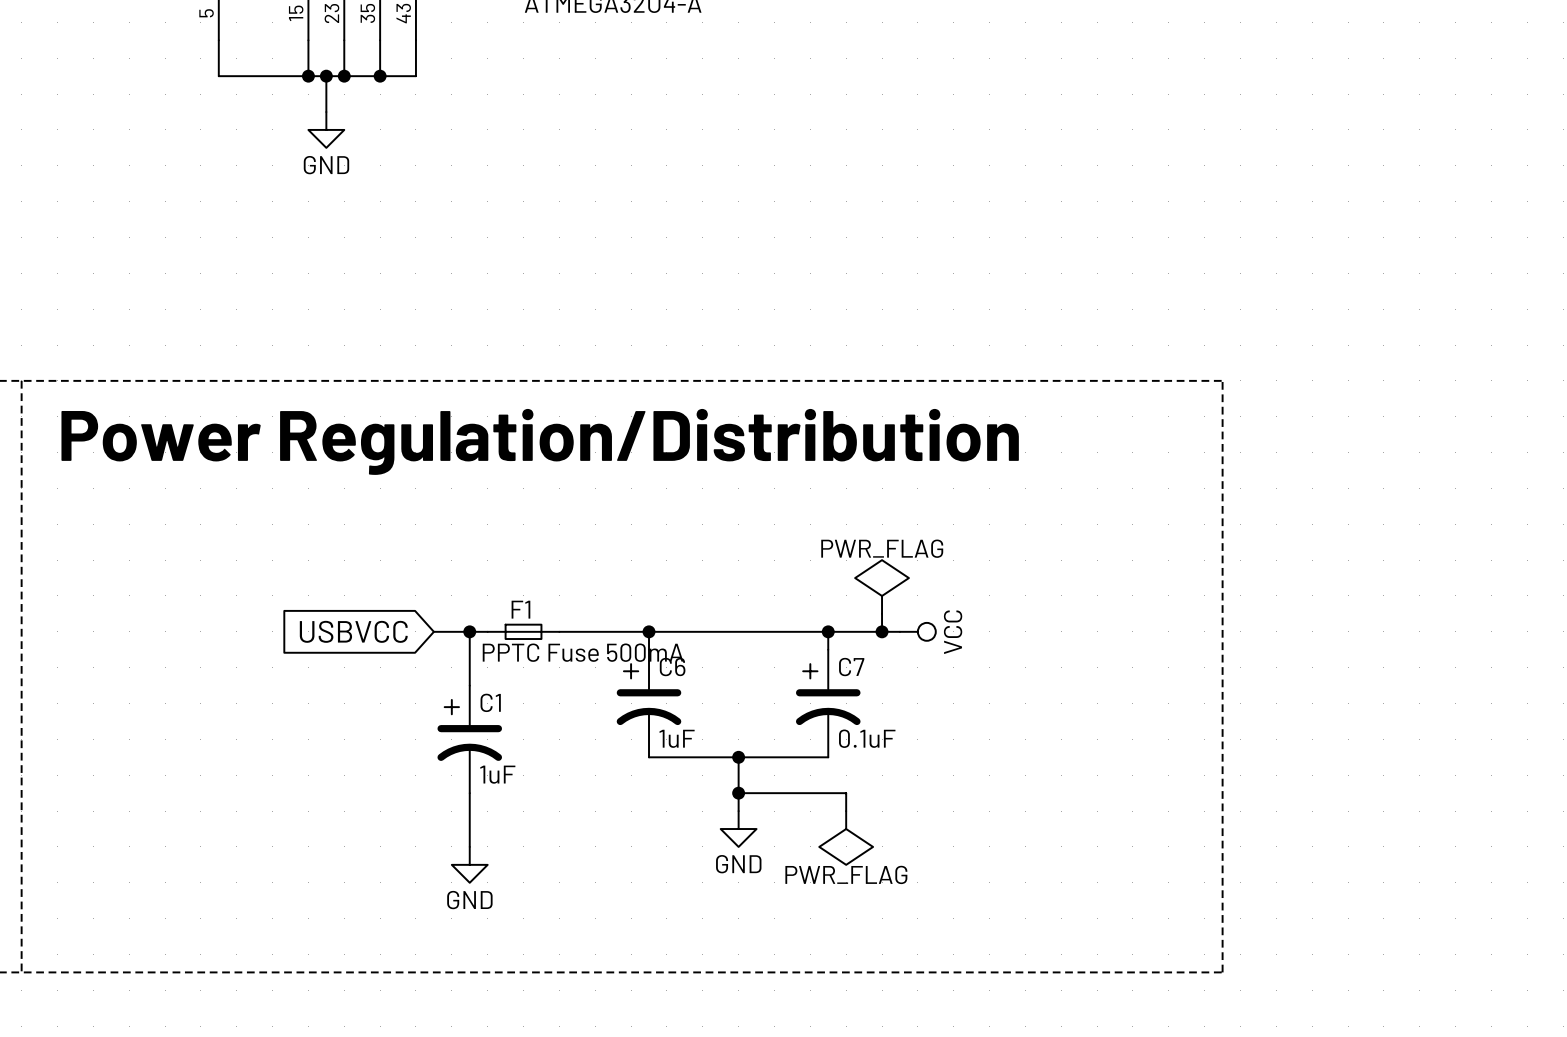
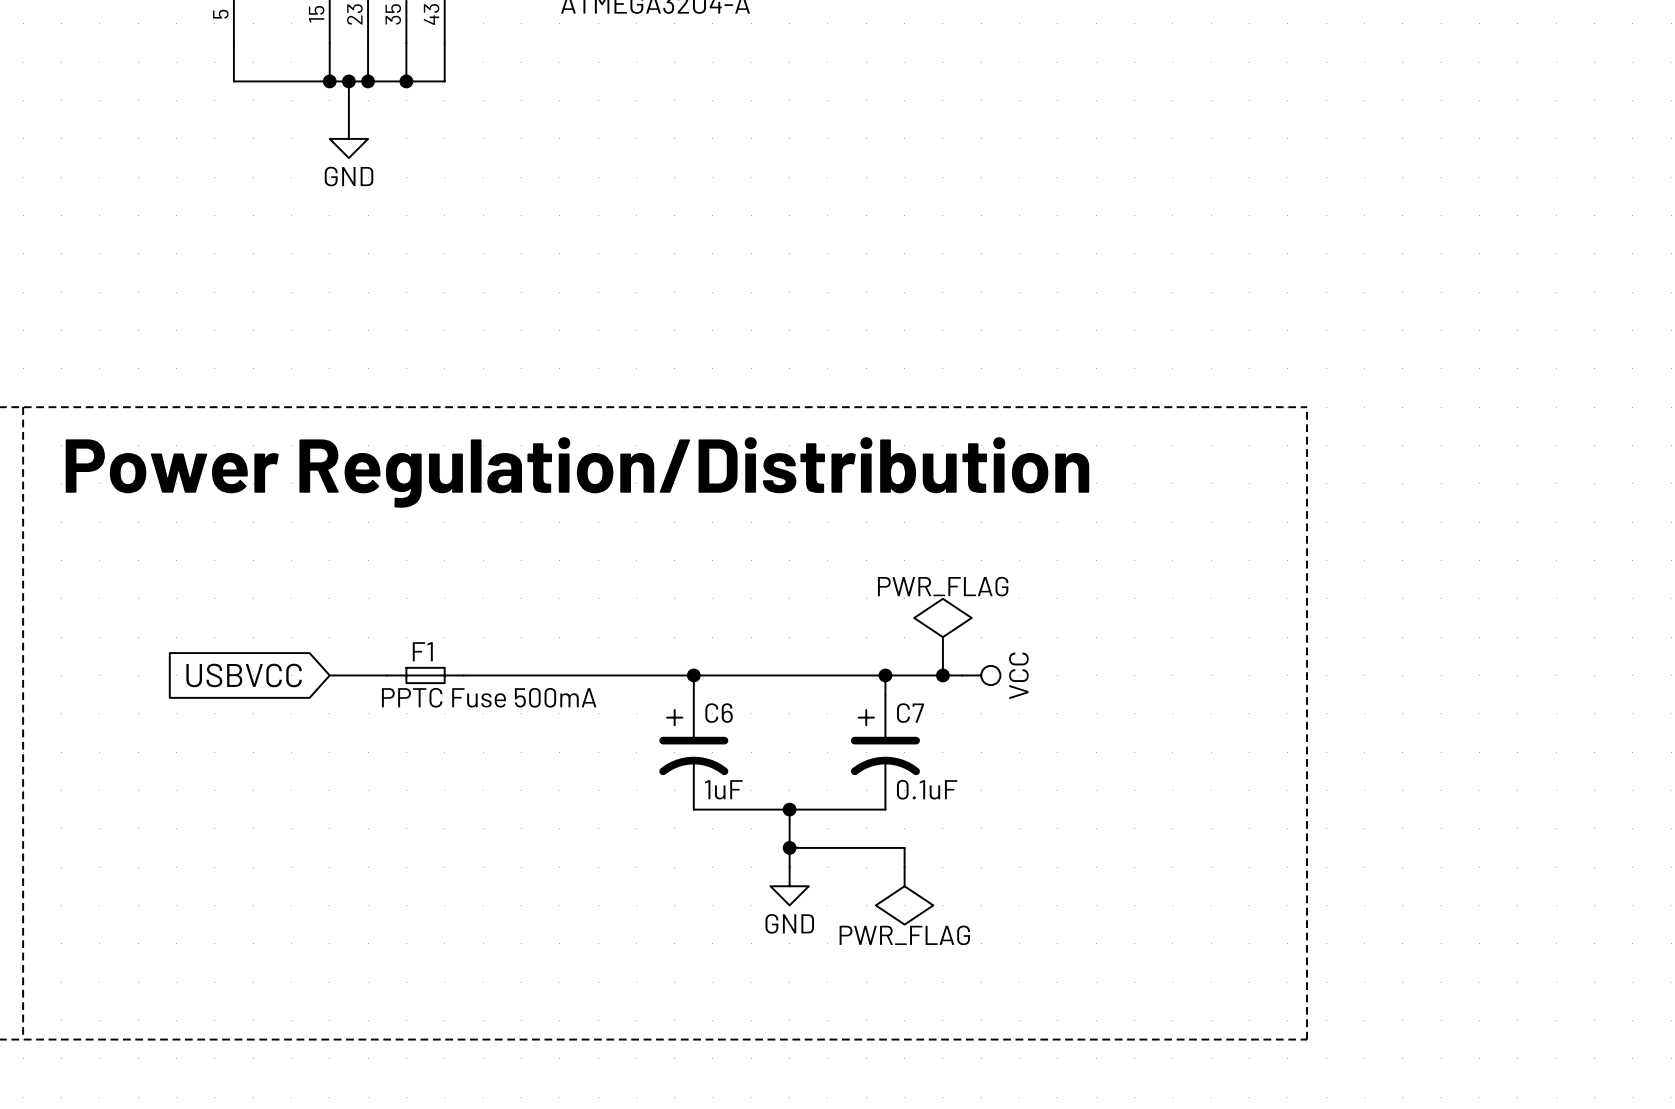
wire: none -> (329, 675) (387, 675)
global label position: USBVCC (353, 631) -> USBVCC (244, 675)
wire: (469, 631) (469, 685) -> none
junction: (469, 631) -> none
F1 position: (523, 631) -> (425, 675)
C1: 1uF (469, 739) -> none
wire: (469, 793) (469, 846) -> none
power symbol: GND (469, 864) -> none

